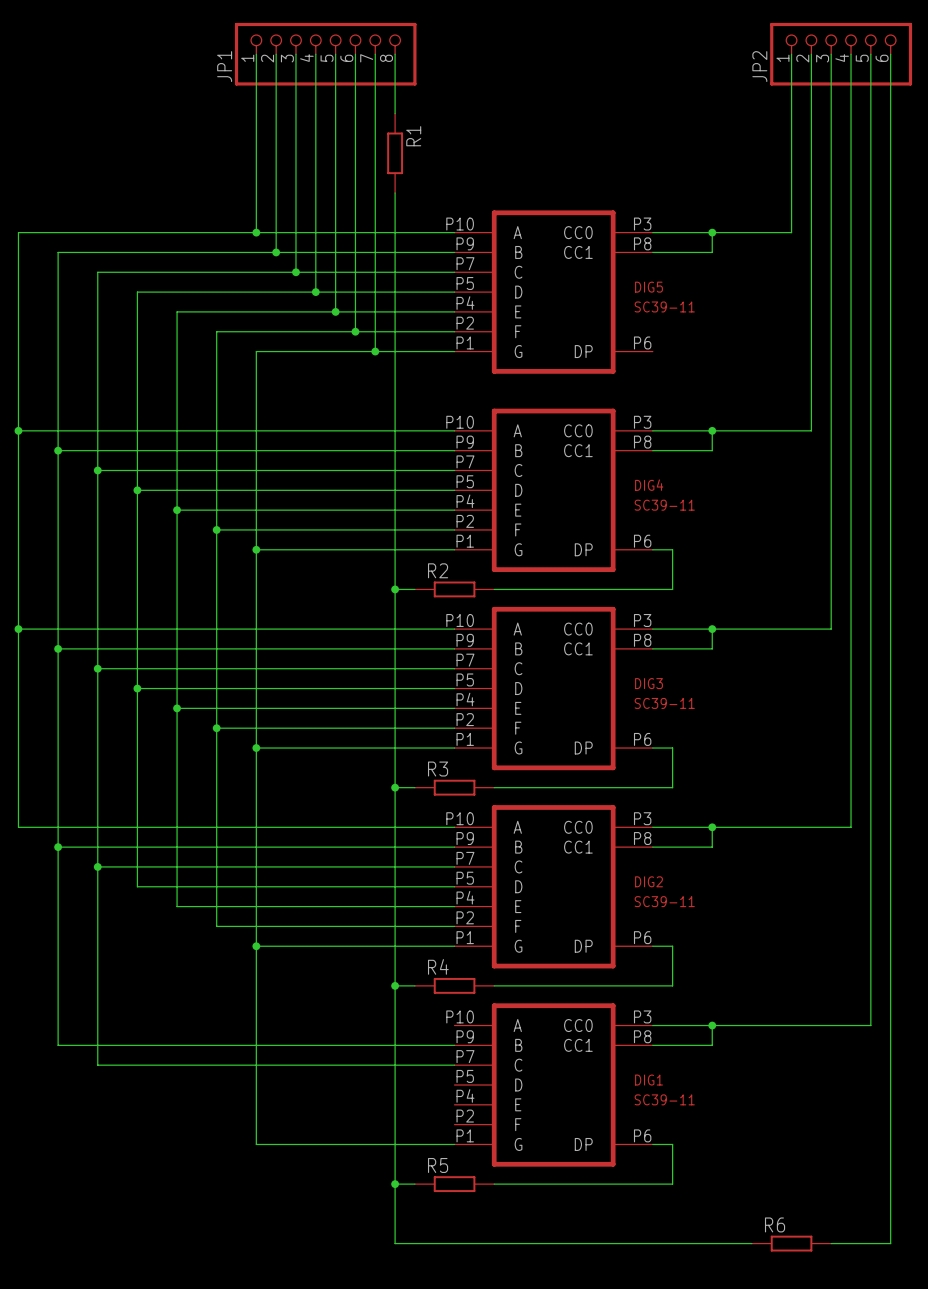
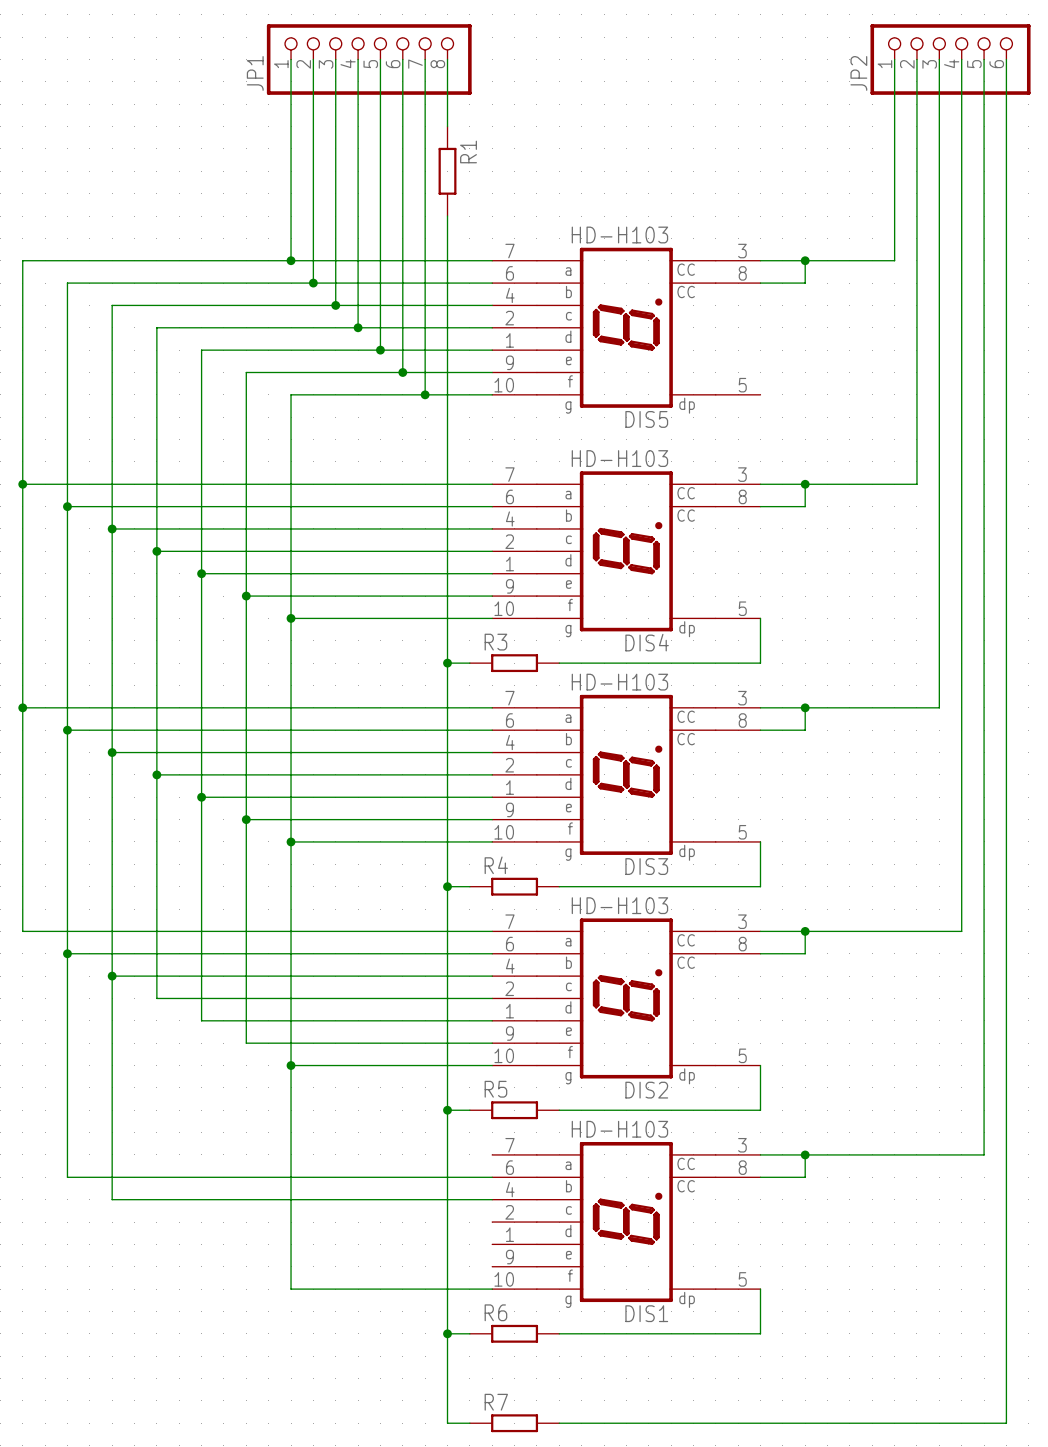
DIG5: SC39-11 (553, 292) -> none
DIS5: none -> HD-H103 (626, 327)
DIG4: SC39-11 (553, 490) -> none
DIS4: none -> HD-H103 (626, 551)
R2 name: R2 (438, 570) -> R3 (495, 642)
DIG3: SC39-11 (553, 688) -> none
DIS3: none -> HD-H103 (626, 774)
R3 name: R3 (438, 769) -> R4 (496, 865)
DIG2: SC39-11 (553, 886) -> none
DIS2: none -> HD-H103 (626, 998)
R4 name: R4 (438, 966) -> R5 (495, 1089)
DIG1: SC39-11 (553, 1085) -> none
DIS1: none -> HD-H103 (626, 1222)
R5 name: R5 (438, 1165) -> R6 (495, 1312)
wire: (395, 1243) (751, 1243) -> (447, 1400) (447, 1423) (469, 1423)
R6: (791, 1243) -> none
wire: (831, 1243) (890, 1243) -> (559, 1423) (1006, 1423) (1006, 1400)
R7: none -> (514, 1423)

